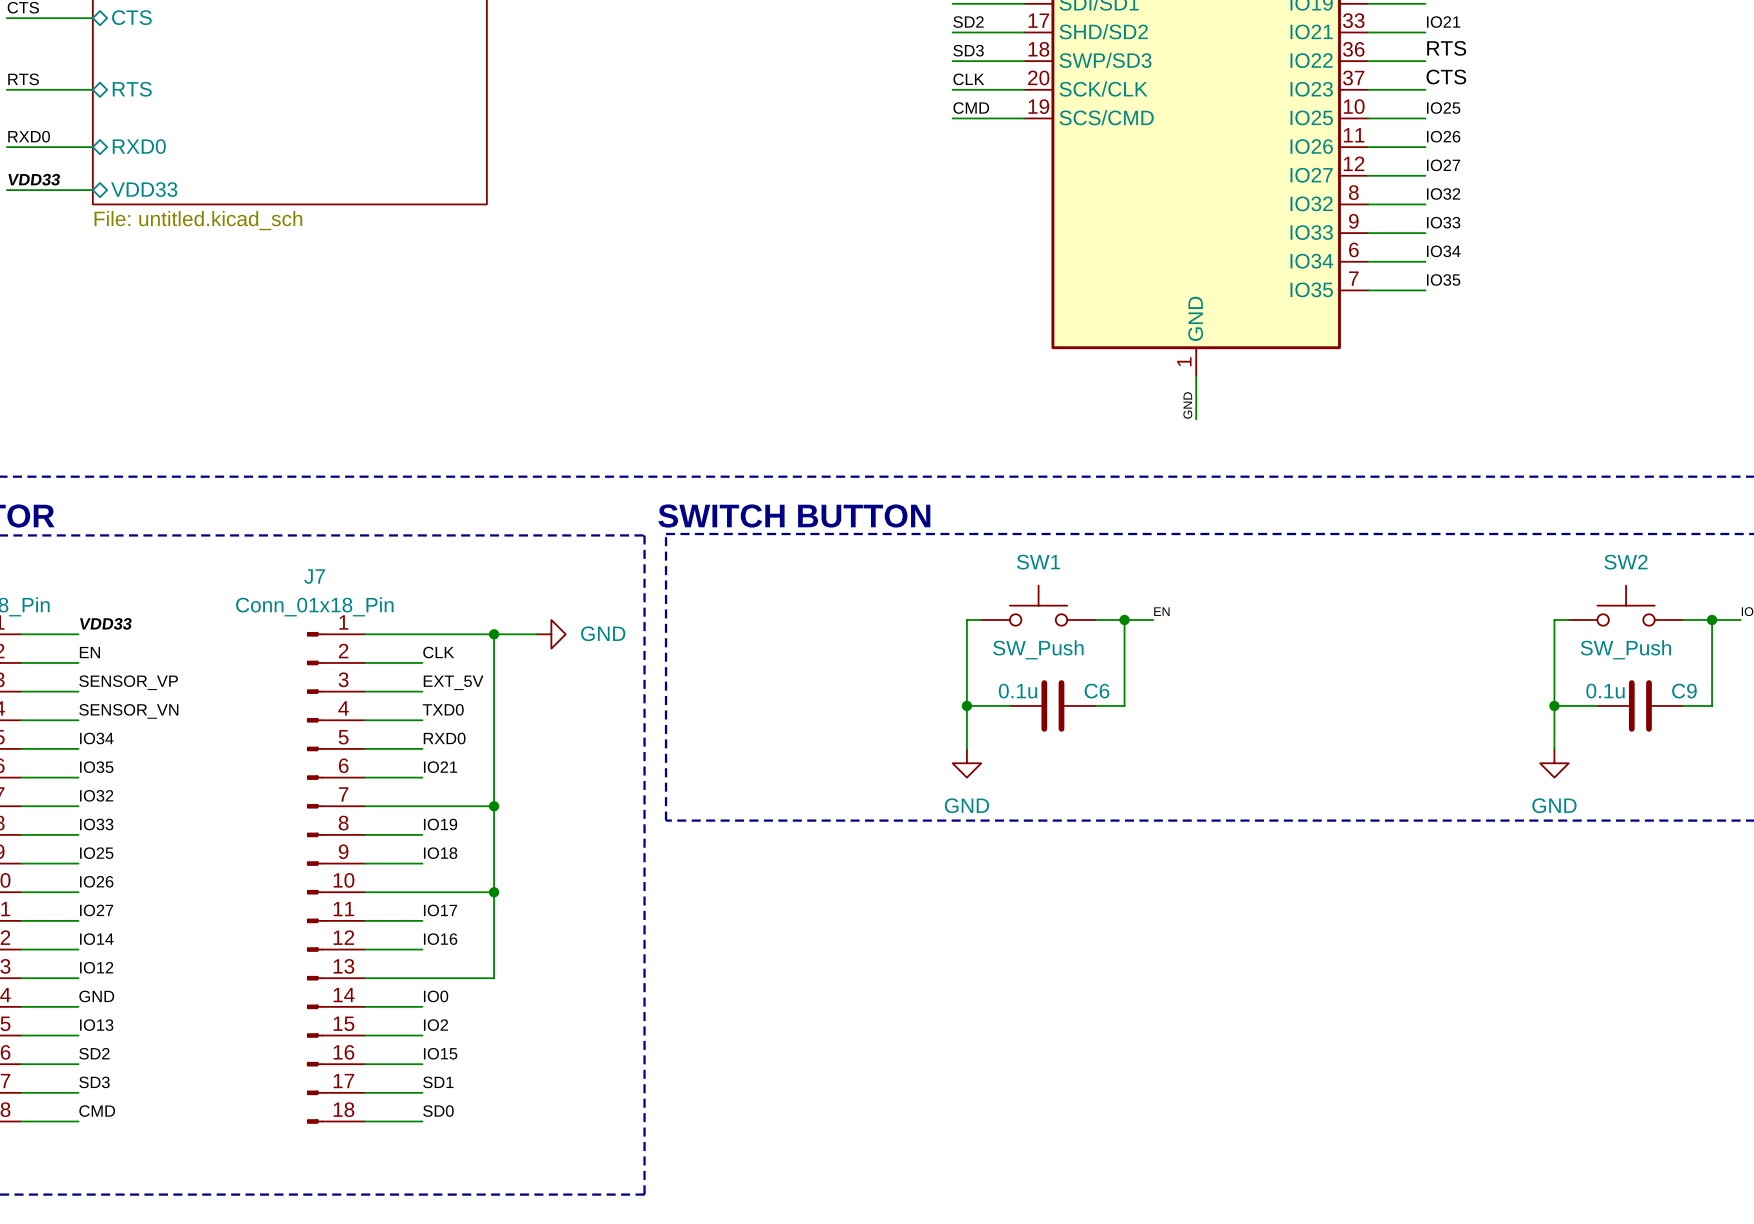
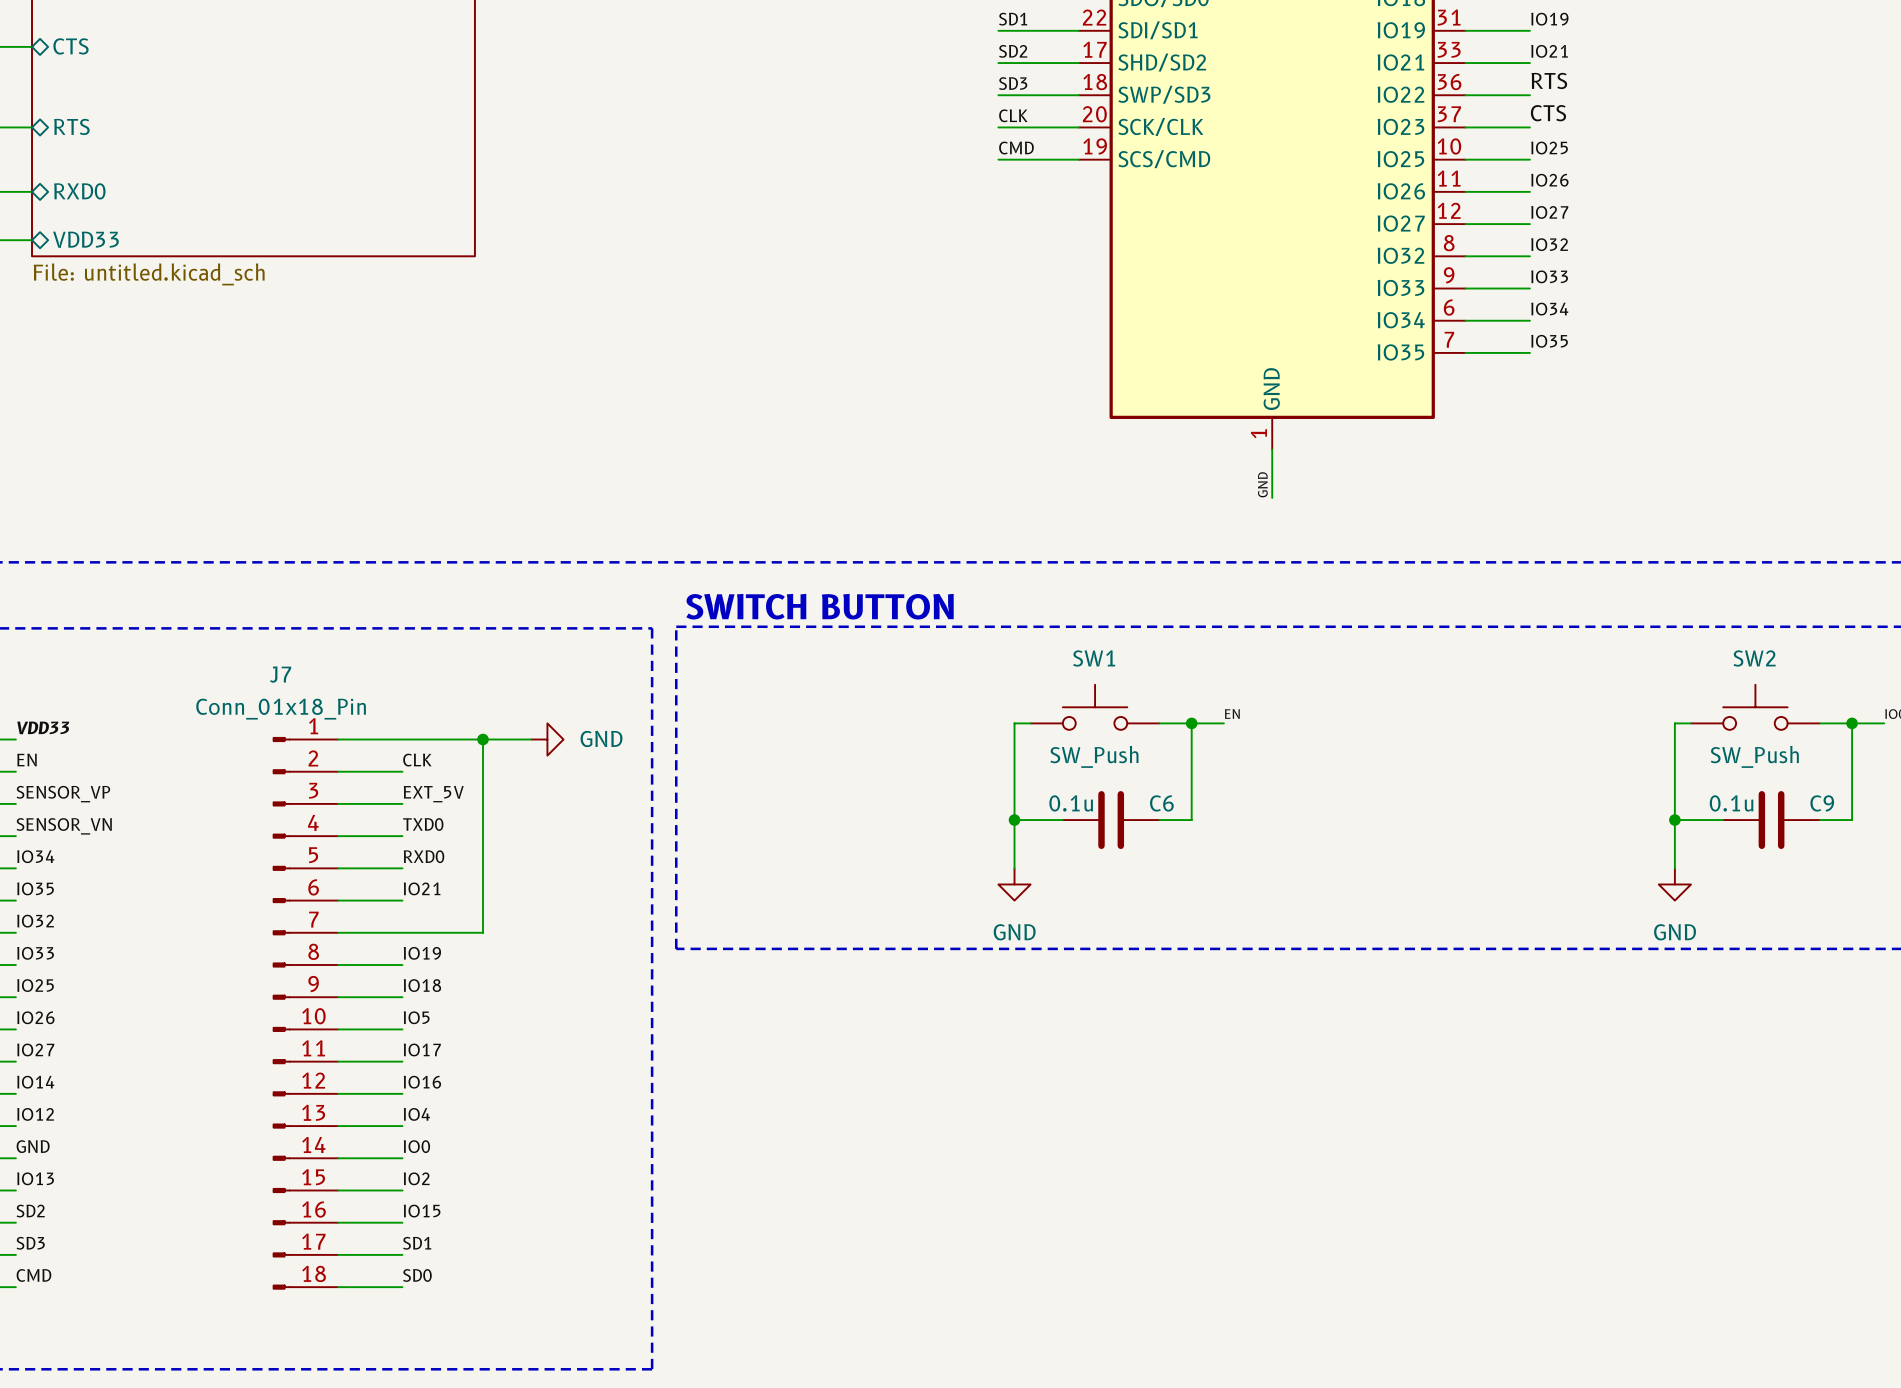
wire: (494, 806) (494, 978) (422, 978) -> none
junction: (494, 806) -> none
label: none -> IO5 (416, 1017)
wire: (422, 892) (494, 892) -> none
junction: (494, 892) -> none
label: none -> IO4 (416, 1114)

